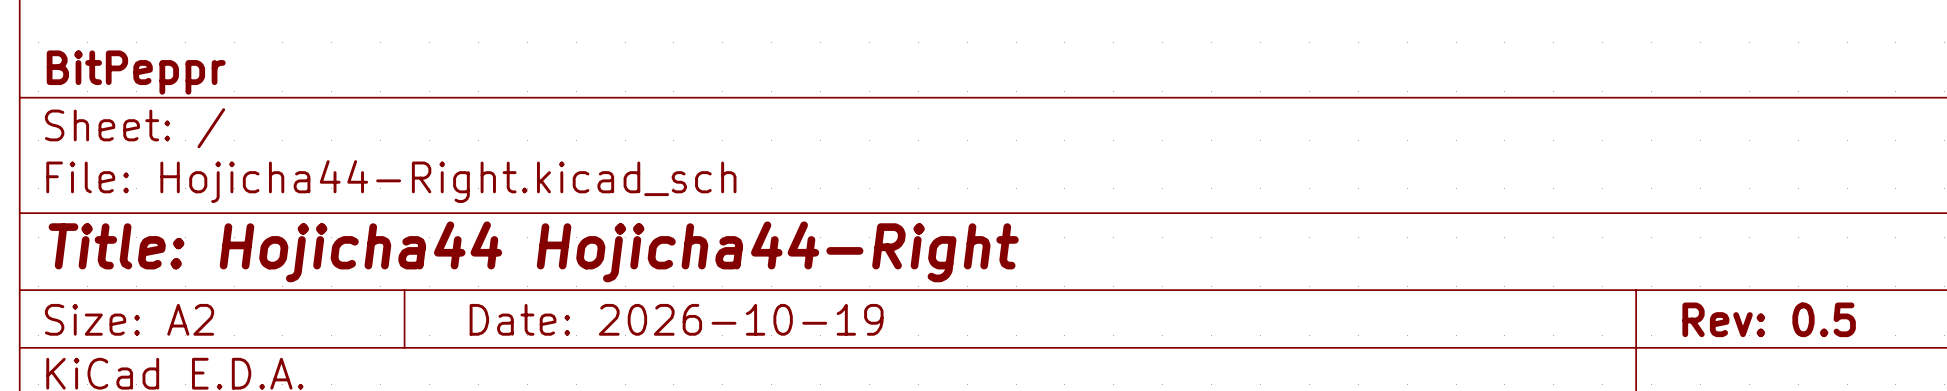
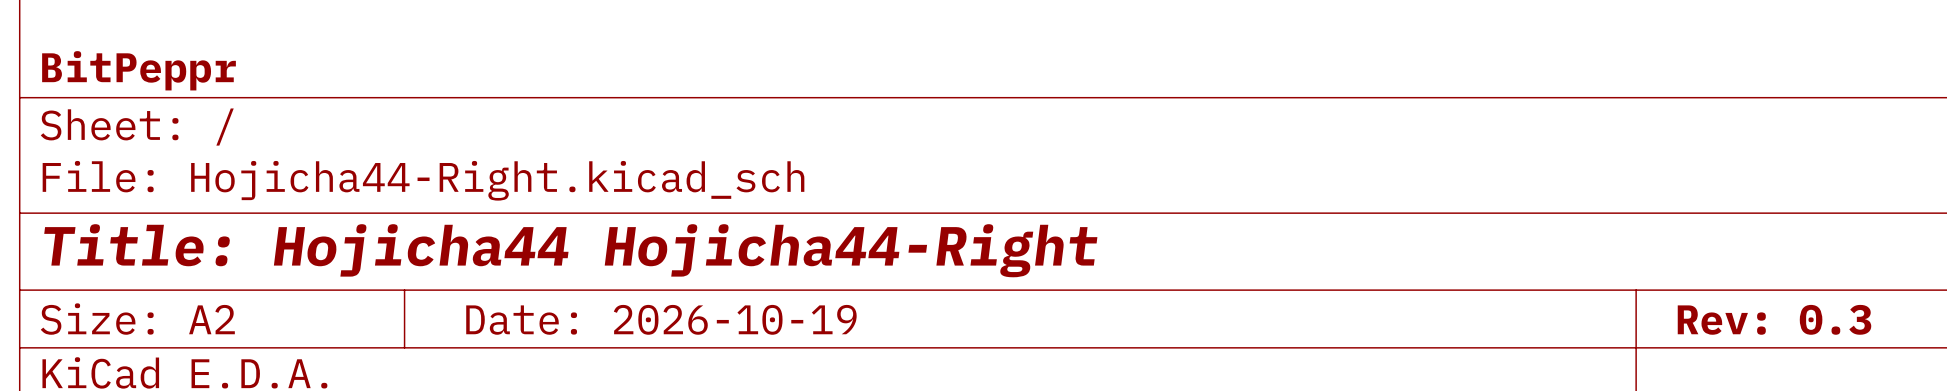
title block: Rev: 0.5 (1769, 319) -> Rev: 0.3 (1774, 319)

